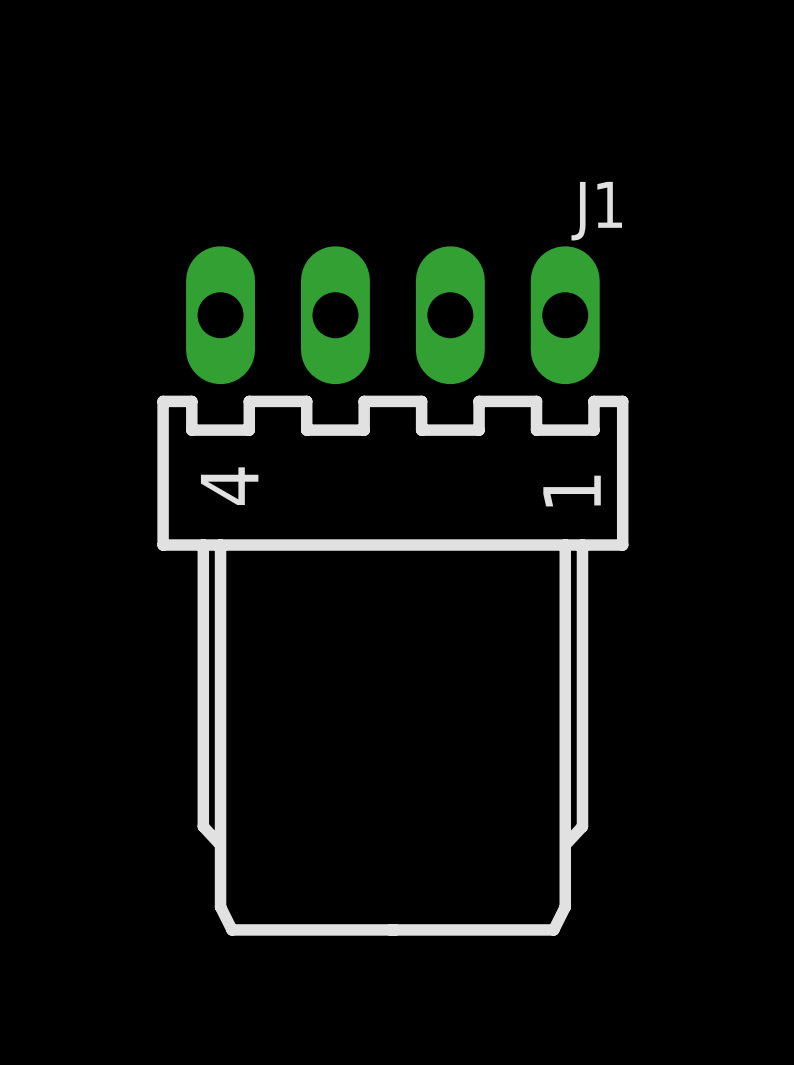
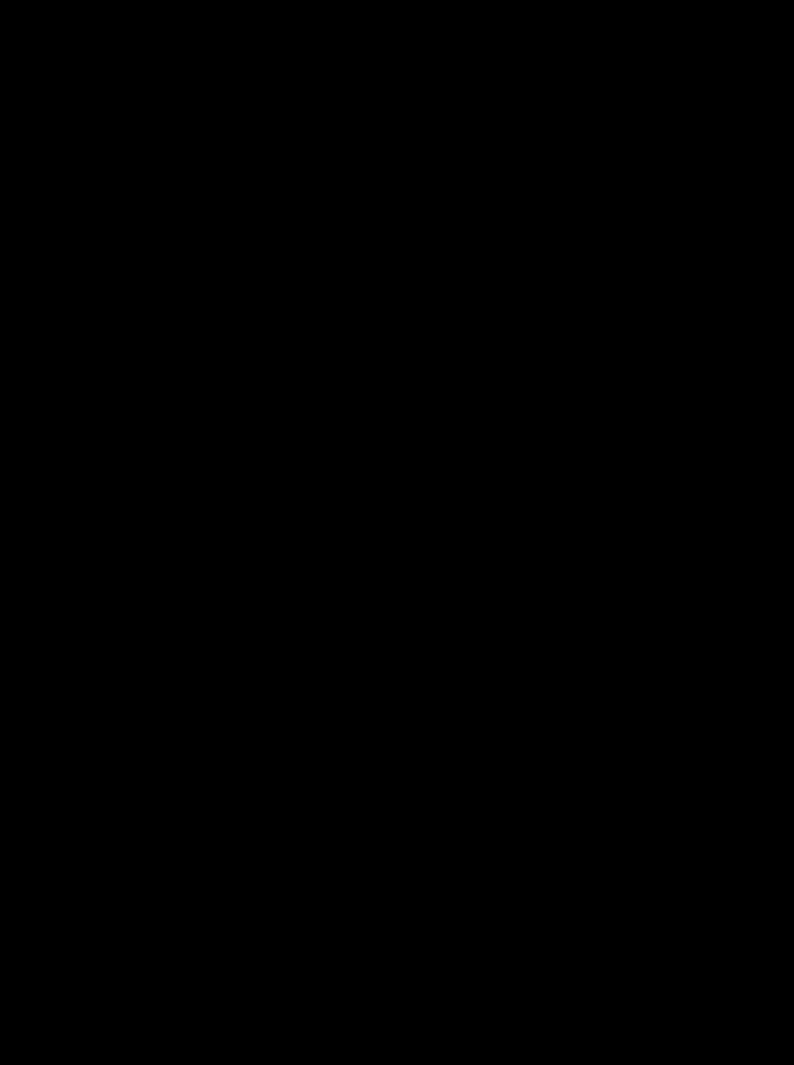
J1: (392, 590) -> none

